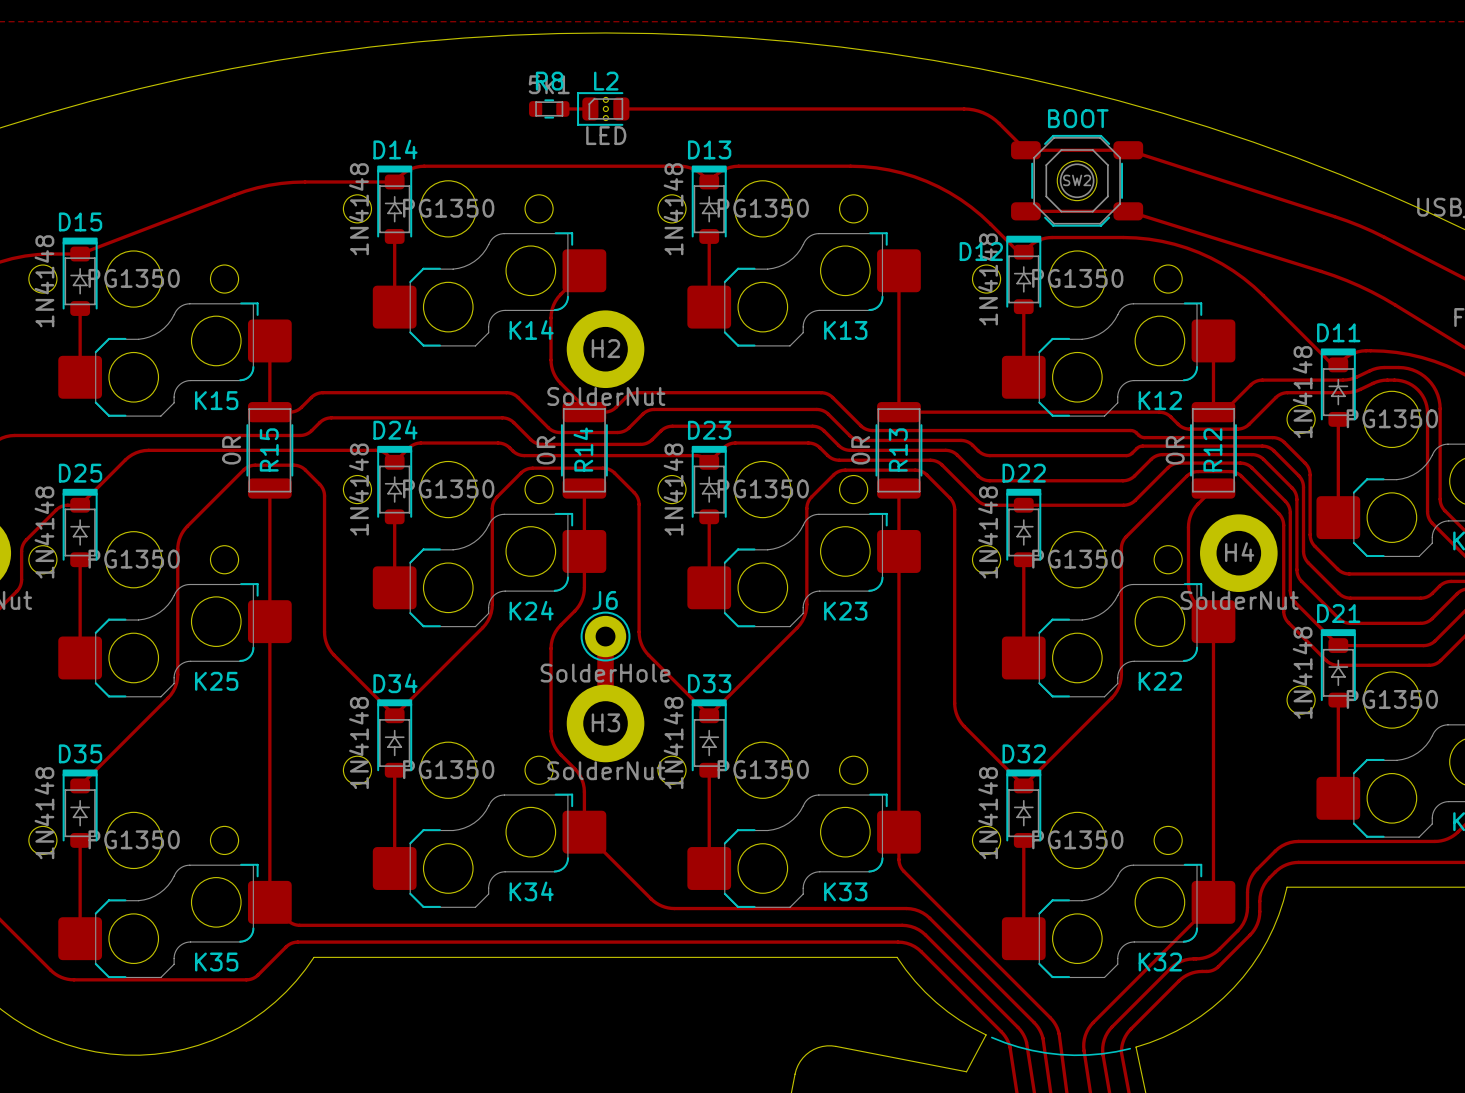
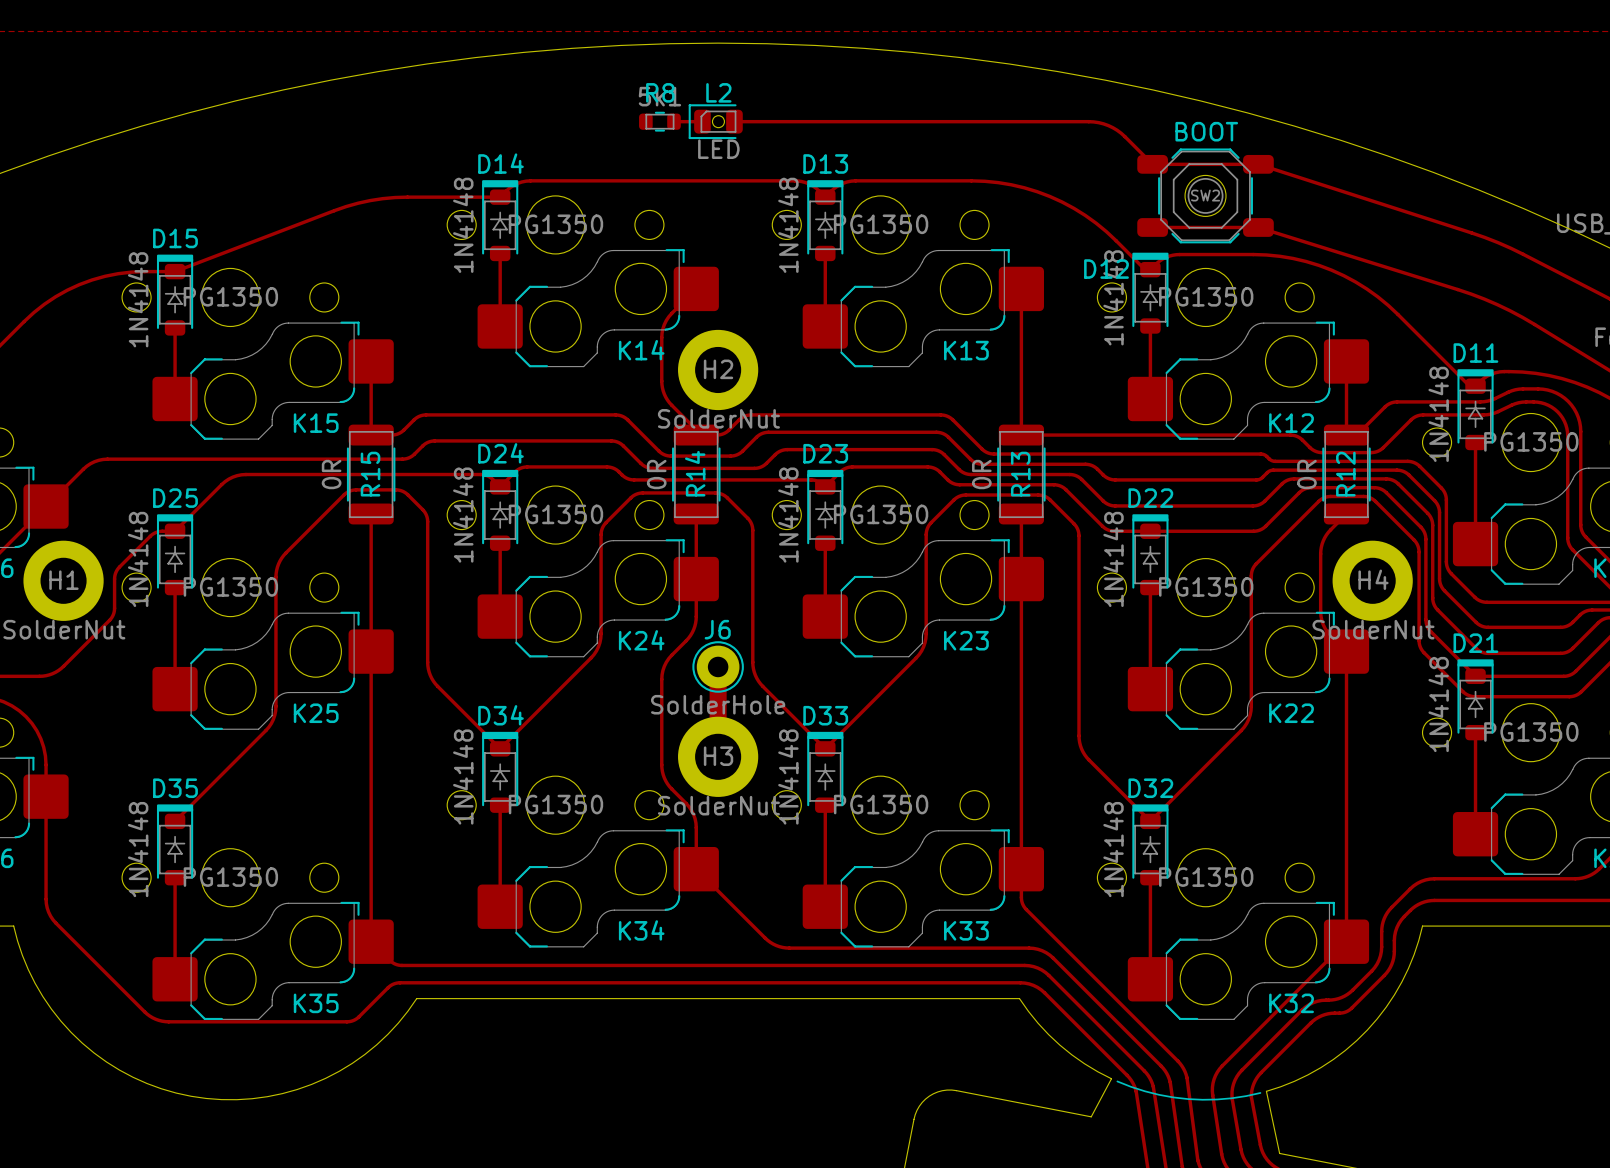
L2 footprint: [577, 92, 630, 126] -> [688, 104, 743, 140]

